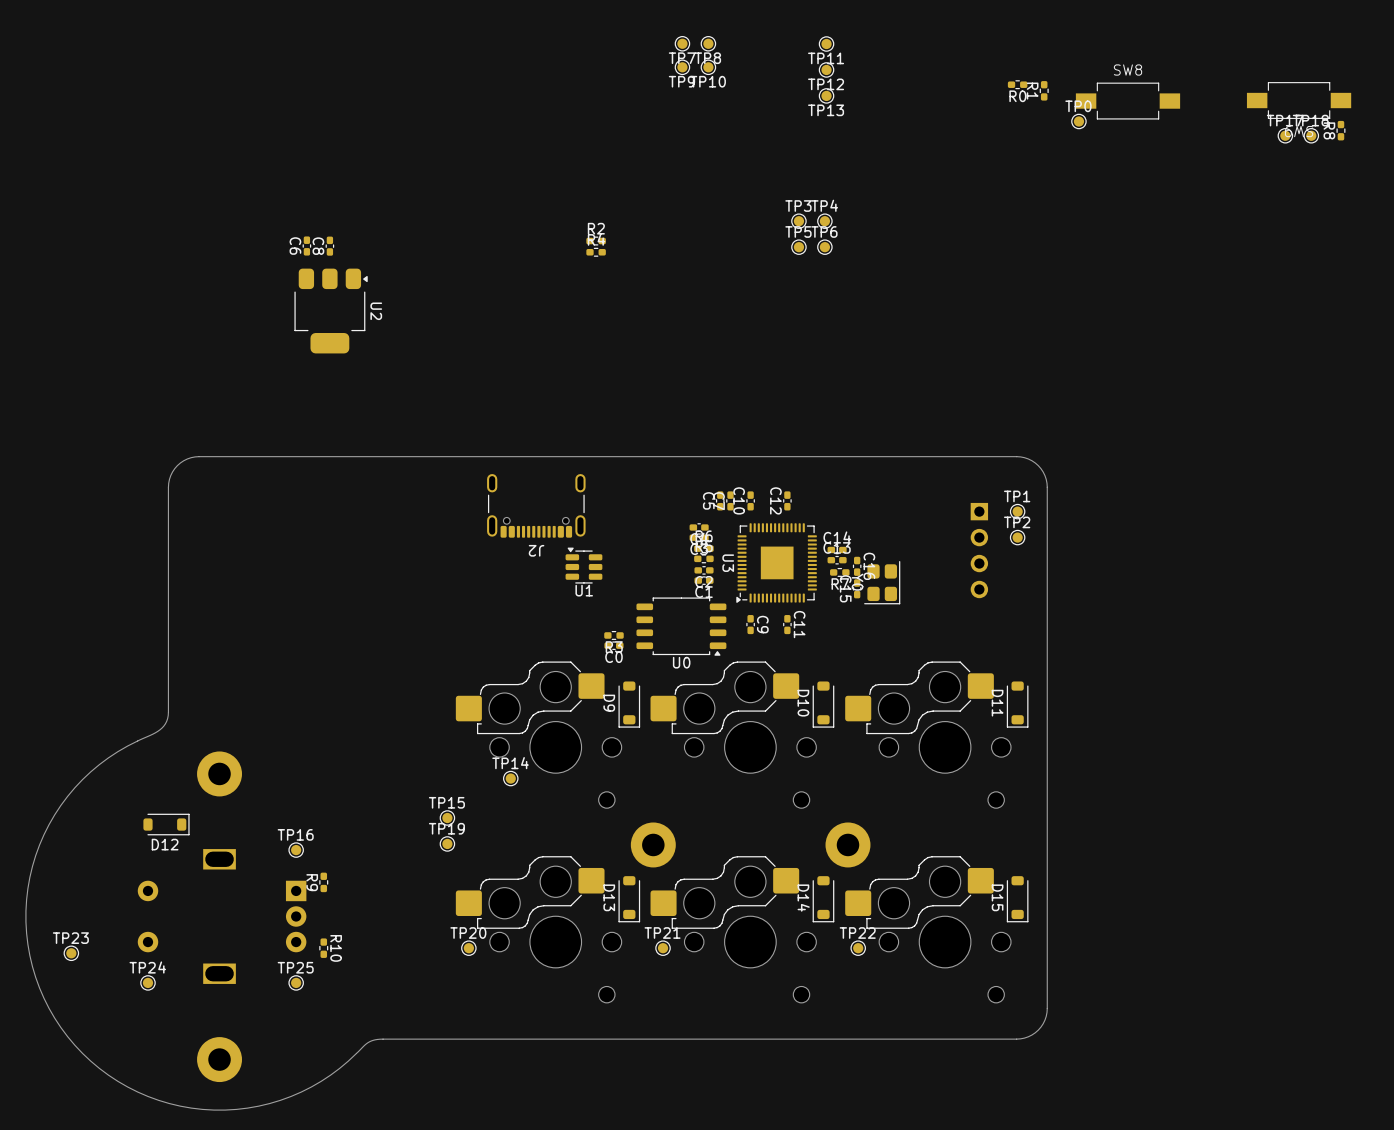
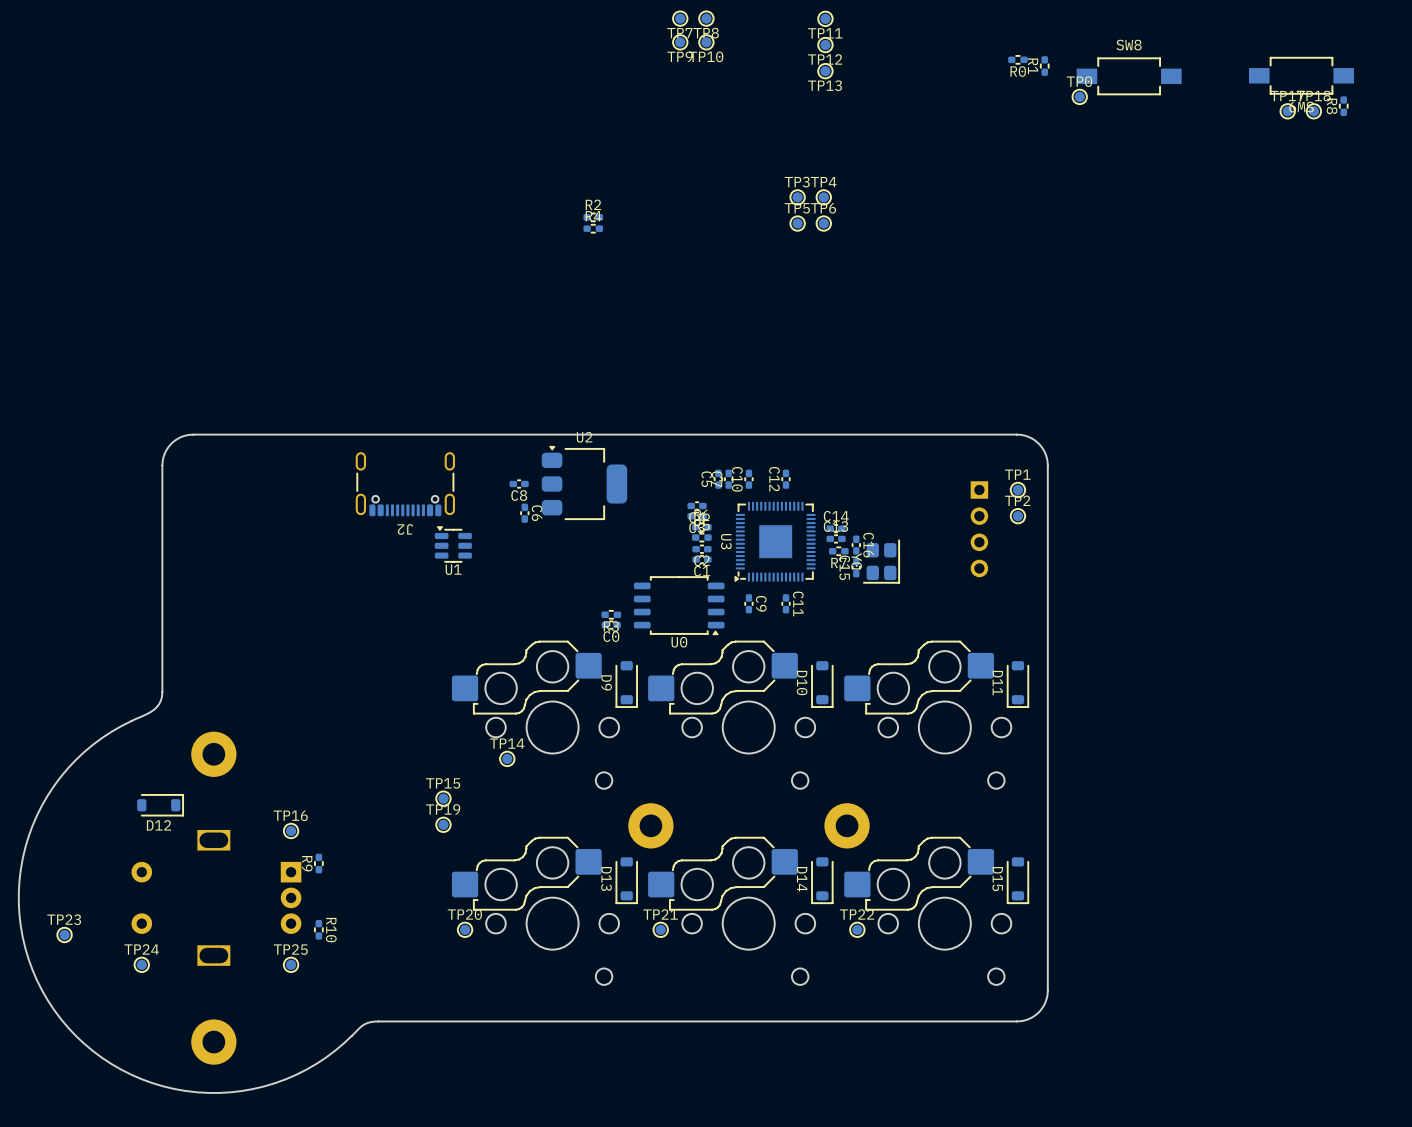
C6 name position: C6 (295, 246) -> C6 (537, 513)
C6 position: (306, 246) -> (524, 513)
C8 rotation: 0° (329, 246) -> 90° clockwise (519, 484)
C8 position: (329, 246) -> (519, 484)
U2 rotation: 0° (331, 311) -> 90° counterclockwise (584, 482)
U2 position: (331, 311) -> (584, 482)
J2 position: (536, 505) -> (405, 484)
U1 position: (583, 565) -> (453, 544)

